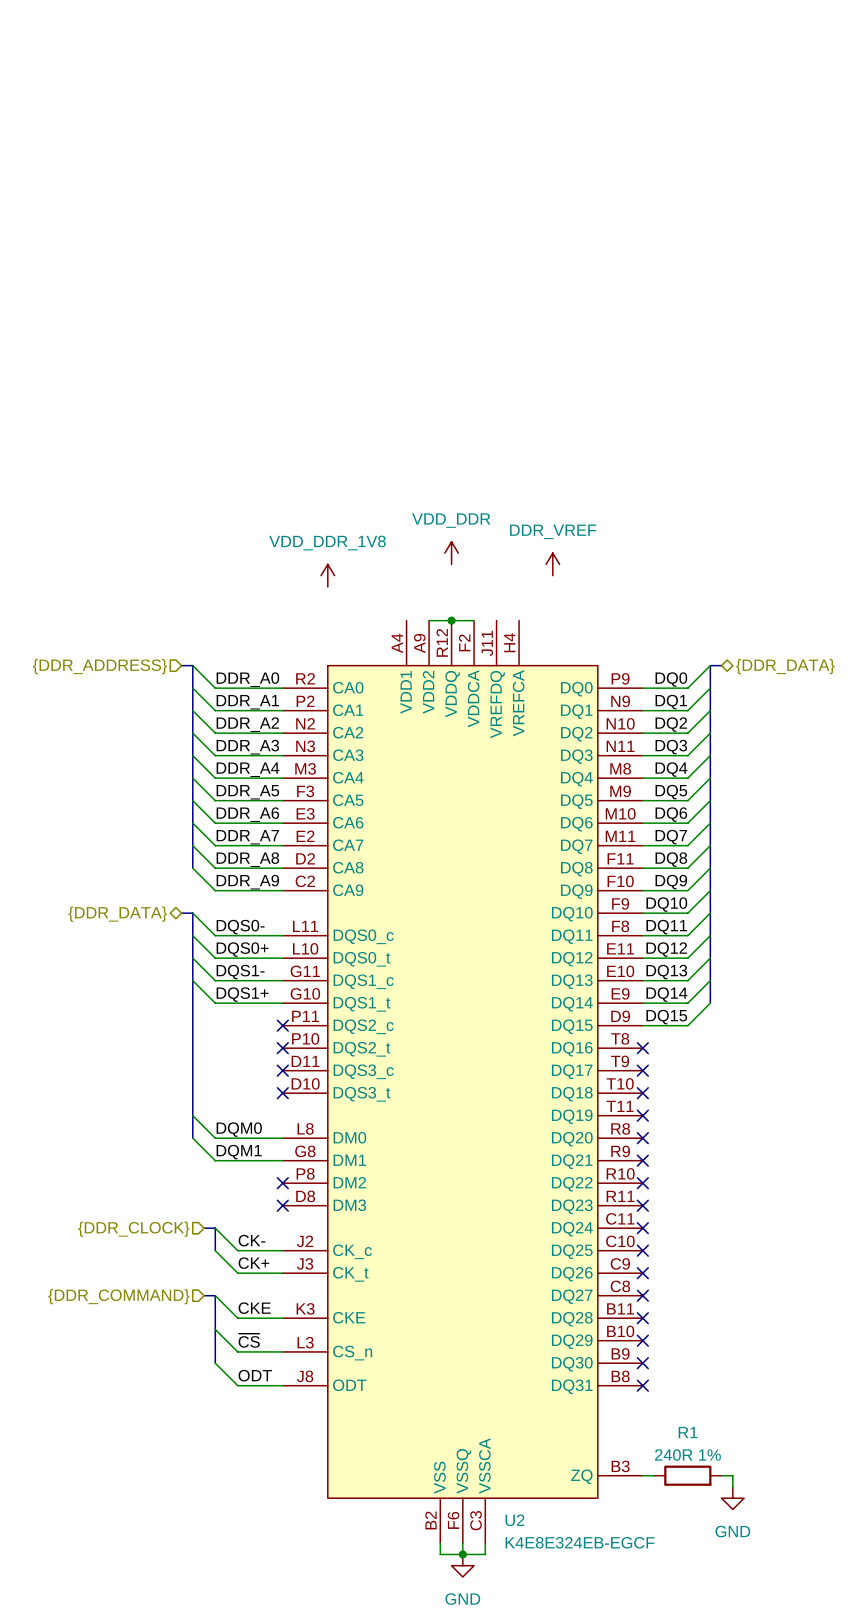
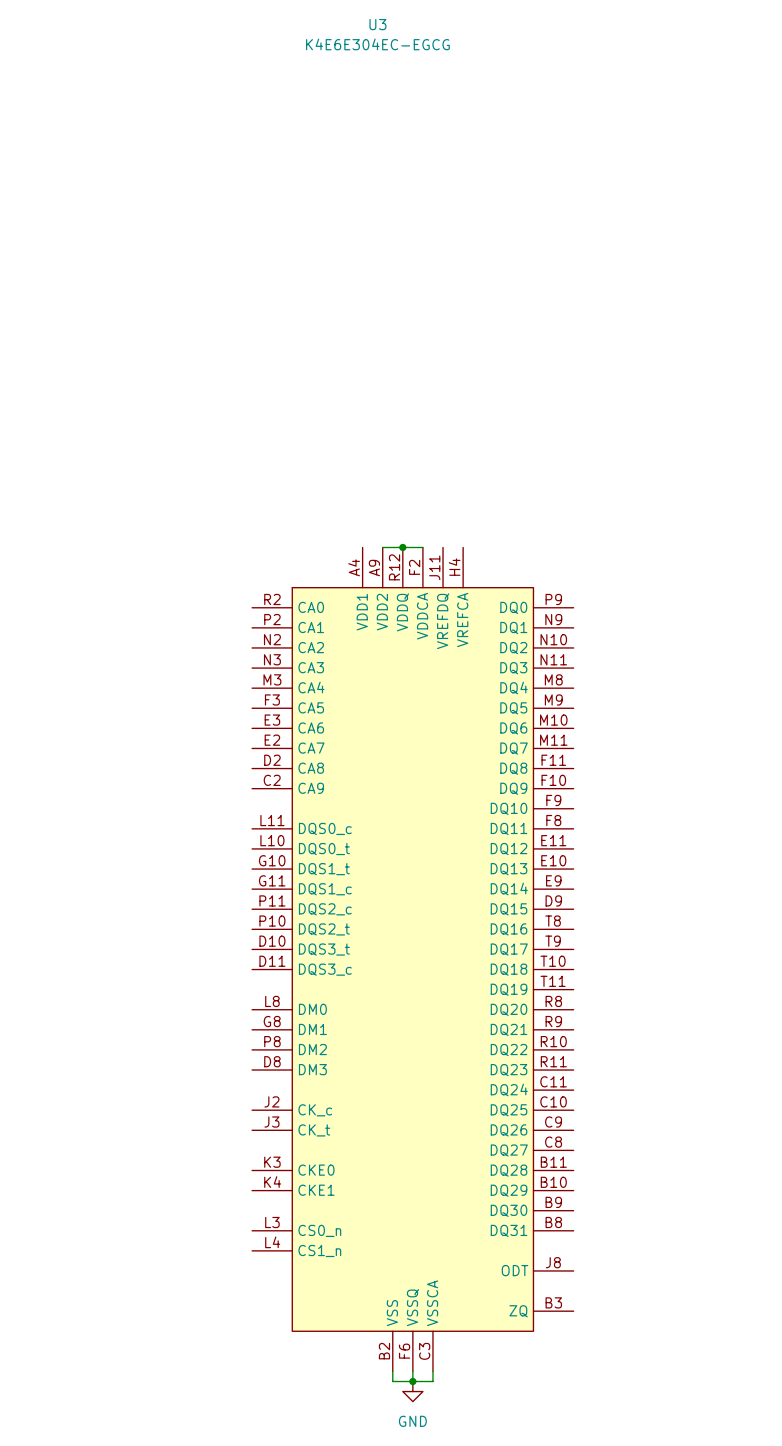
power symbol: VDD_DDR (451, 553) -> none
power symbol: DDR_VREF (552, 564) -> none
power symbol: VDD_DDR_1V8 (327, 575) -> none
bus: (181, 665) (192, 665) (192, 868) -> none
wire: (192, 665) (215, 688) (282, 688) -> none
wire: (710, 665) (687, 688) (642, 688) -> none
bus: (721, 665) (710, 665) (710, 1003) -> none
hierarchical label: {DDR_ADDRESS} (99, 666) -> none
hierarchical label: {DDR_DATA} (785, 666) -> none
label: DDR_A0 (247, 679) -> none
label: DQ0 (671, 679) -> none
wire: (192, 688) (215, 710) (282, 710) -> none
wire: (710, 688) (687, 710) (642, 710) -> none
label: DDR_A1 (247, 702) -> none
label: DQ1 (671, 702) -> none
wire: (192, 710) (215, 733) (282, 733) -> none
wire: (710, 710) (687, 733) (642, 733) -> none
label: DDR_A2 (247, 724) -> none
label: DQ2 (671, 724) -> none
wire: (192, 733) (215, 755) (282, 755) -> none
wire: (710, 733) (687, 755) (642, 755) -> none
label: DDR_A3 (247, 747) -> none
label: DQ3 (671, 747) -> none
wire: (192, 755) (215, 778) (282, 778) -> none
wire: (710, 755) (687, 778) (642, 778) -> none
label: DDR_A4 (247, 769) -> none
label: DQ4 (671, 769) -> none
wire: (192, 778) (215, 800) (282, 800) -> none
wire: (710, 778) (687, 800) (642, 800) -> none
label: DDR_A5 (247, 792) -> none
label: DQ5 (671, 792) -> none
wire: (192, 800) (215, 823) (282, 823) -> none
wire: (710, 800) (687, 823) (642, 823) -> none
label: DDR_A6 (247, 814) -> none
label: DQ6 (671, 814) -> none
wire: (192, 823) (215, 845) (282, 845) -> none
wire: (710, 823) (687, 845) (642, 845) -> none
label: DDR_A7 (247, 837) -> none
label: DQ7 (671, 837) -> none
wire: (192, 845) (215, 868) (282, 868) -> none
wire: (710, 845) (687, 868) (642, 868) -> none
label: DDR_A8 (247, 859) -> none
label: DQ8 (671, 859) -> none
wire: (192, 868) (215, 890) (282, 890) -> none
wire: (710, 868) (687, 890) (642, 890) -> none
label: DDR_A9 (247, 882) -> none
label: DQ9 (671, 882) -> none
wire: (710, 890) (687, 913) (642, 913) -> none
label: DQ10 (666, 904) -> none
bus: (181, 913) (192, 913) (192, 1138) -> none
wire: (192, 913) (215, 935) (282, 935) -> none
wire: (710, 913) (687, 935) (642, 935) -> none
hierarchical label: {DDR_DATA} (117, 914) -> none
label: DQS0- (240, 927) -> none
label: DQ11 (666, 927) -> none
wire: (192, 935) (215, 958) (282, 958) -> none
wire: (710, 935) (687, 958) (642, 958) -> none
label: DQS0+ (242, 949) -> none
label: DQ12 (666, 949) -> none
wire: (192, 958) (215, 980) (282, 980) -> none
wire: (710, 958) (687, 980) (642, 980) -> none
label: DQS1- (240, 972) -> none
label: DQ13 (666, 972) -> none
wire: (192, 980) (215, 1003) (282, 1003) -> none
wire: (710, 980) (687, 1003) (642, 1003) -> none
label: DQS1+ (242, 994) -> none
label: DQ14 (666, 994) -> none
wire: (710, 1003) (687, 1025) (642, 1025) -> none
label: DQ15 (666, 1017) -> none
no-connect mark: (282, 1025) -> none
no-connect mark: (282, 1048) -> none
no-connect mark: (642, 1048) -> none
no-connect mark: (282, 1070) -> none
no-connect mark: (642, 1070) -> none
U2: K4E8E324EB-EGCF (462, 1081) -> none
U3: none -> K4E6E304EC-EGCG (412, 959)
no-connect mark: (282, 1093) -> none
no-connect mark: (642, 1093) -> none
wire: (192, 1115) (215, 1138) (282, 1138) -> none
no-connect mark: (642, 1115) -> none
label: DQM0 (239, 1129) -> none
wire: (192, 1138) (215, 1160) (282, 1160) -> none
no-connect mark: (642, 1138) -> none
label: DQM1 (239, 1152) -> none
no-connect mark: (642, 1160) -> none
no-connect mark: (282, 1183) -> none
no-connect mark: (642, 1183) -> none
no-connect mark: (282, 1205) -> none
no-connect mark: (642, 1205) -> none
bus: (204, 1228) (215, 1228) (215, 1250) -> none
wire: (215, 1228) (237, 1250) (282, 1250) -> none
no-connect mark: (642, 1228) -> none
hierarchical label: {DDR_CLOCK} (133, 1229) -> none
label: CK- (251, 1240) -> none
wire: (215, 1250) (237, 1273) (282, 1273) -> none
no-connect mark: (642, 1250) -> none
label: CK+ (253, 1263) -> none
no-connect mark: (642, 1273) -> none
bus: (204, 1295) (215, 1295) (215, 1363) -> none
wire: (215, 1295) (237, 1318) (282, 1318) -> none
no-connect mark: (642, 1295) -> none
hierarchical label: {DDR_COMMAND} (118, 1296) -> none
label: CKE (254, 1308) -> none
no-connect mark: (642, 1318) -> none
wire: (215, 1329) (237, 1351) (282, 1351) -> none
label: ~{CS} (249, 1340) -> none
no-connect mark: (642, 1340) -> none
wire: (215, 1363) (237, 1385) (282, 1385) -> none
no-connect mark: (642, 1363) -> none
label: ODT (255, 1375) -> none
no-connect mark: (642, 1385) -> none
wire: (642, 1475) (654, 1475) -> none
R1: 240R 1% (687, 1475) -> none
wire: (721, 1475) (732, 1475) (732, 1486) -> none
power symbol: GND (732, 1498) -> none

